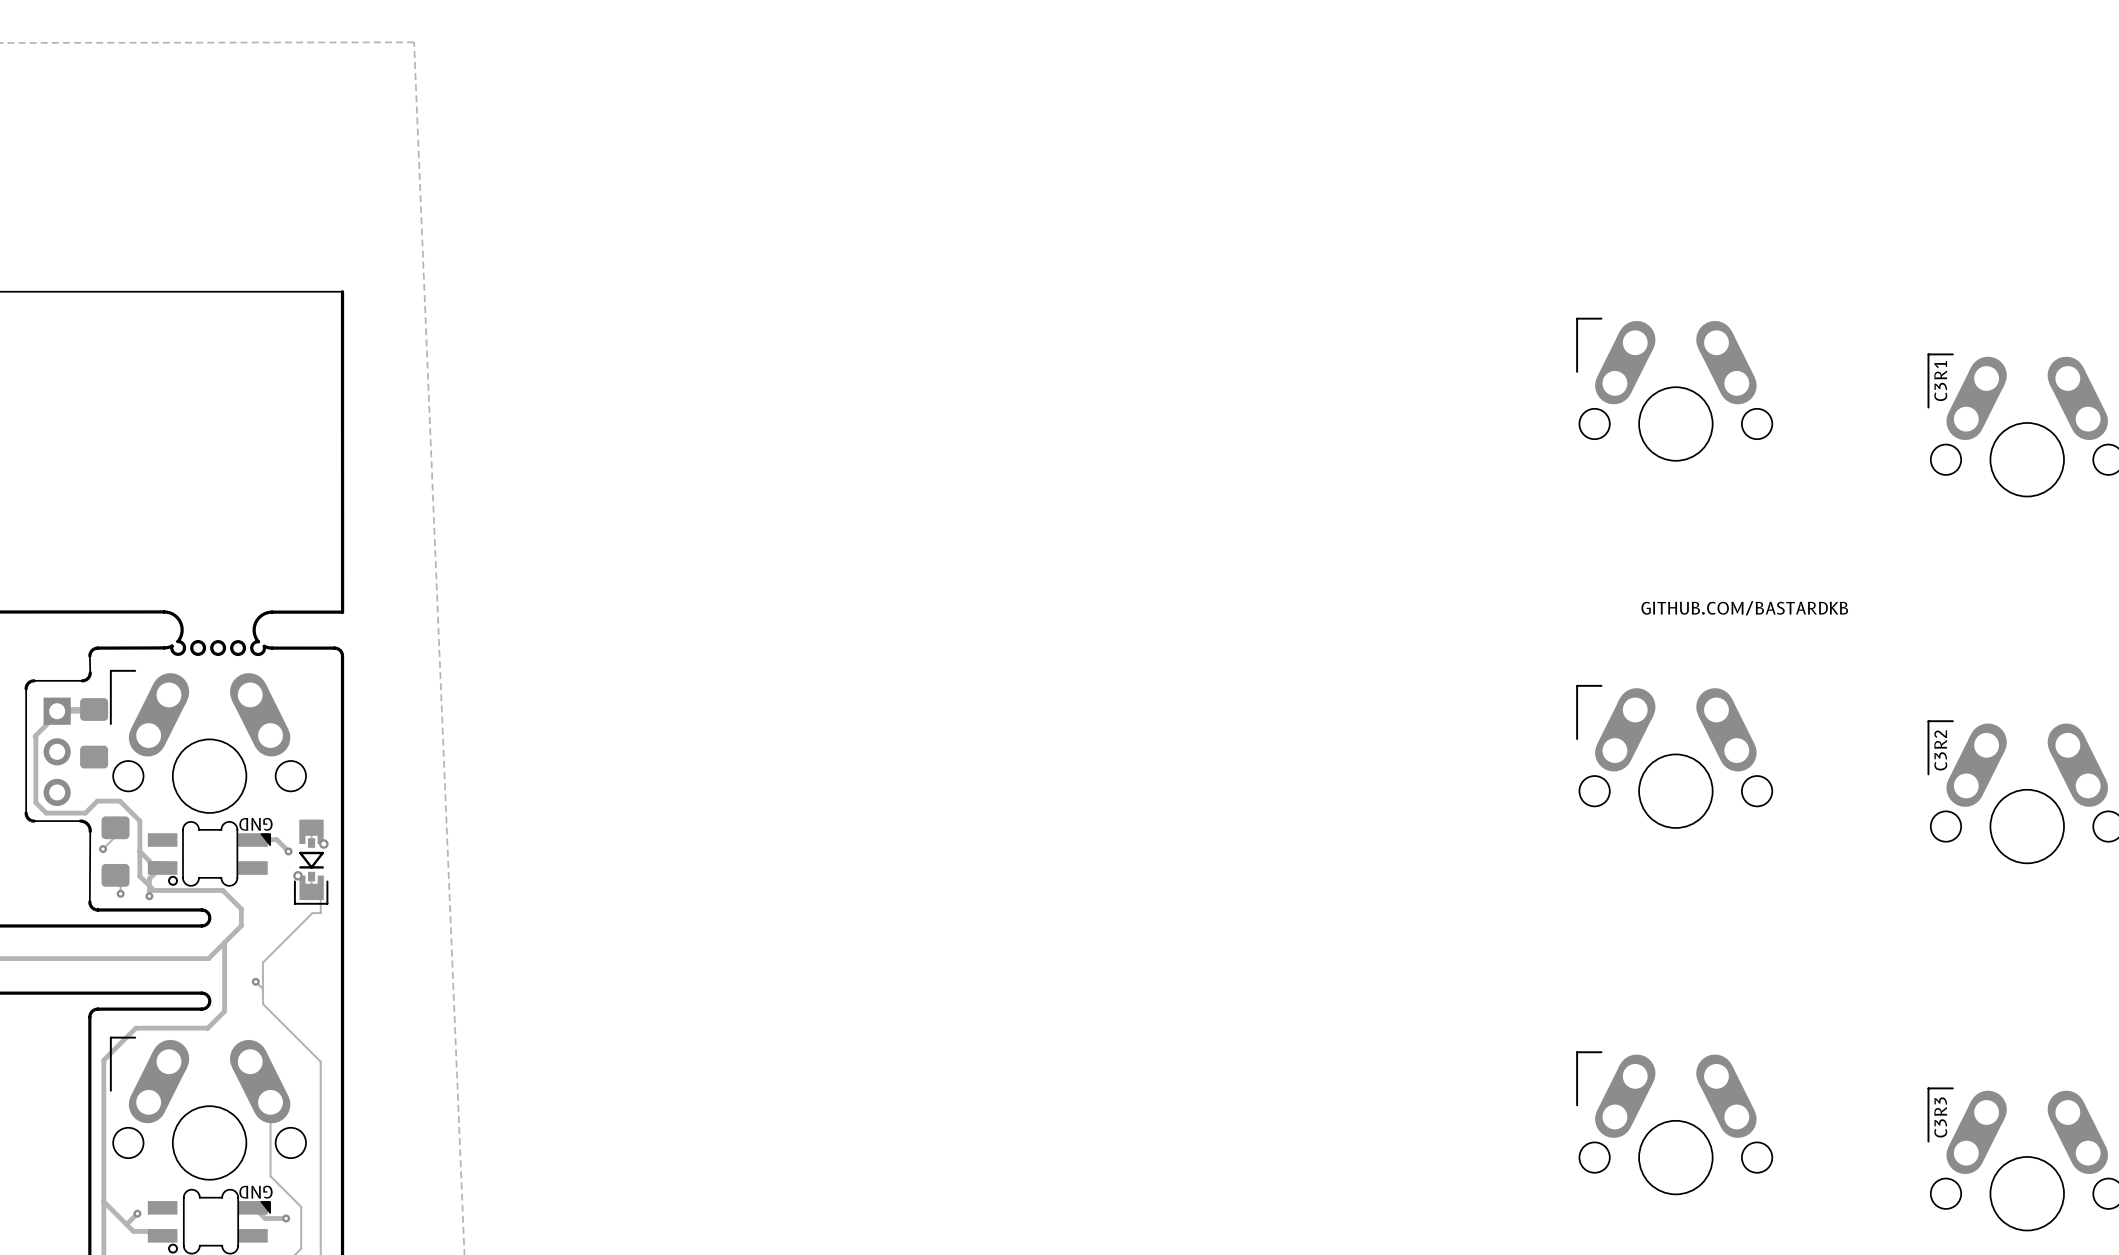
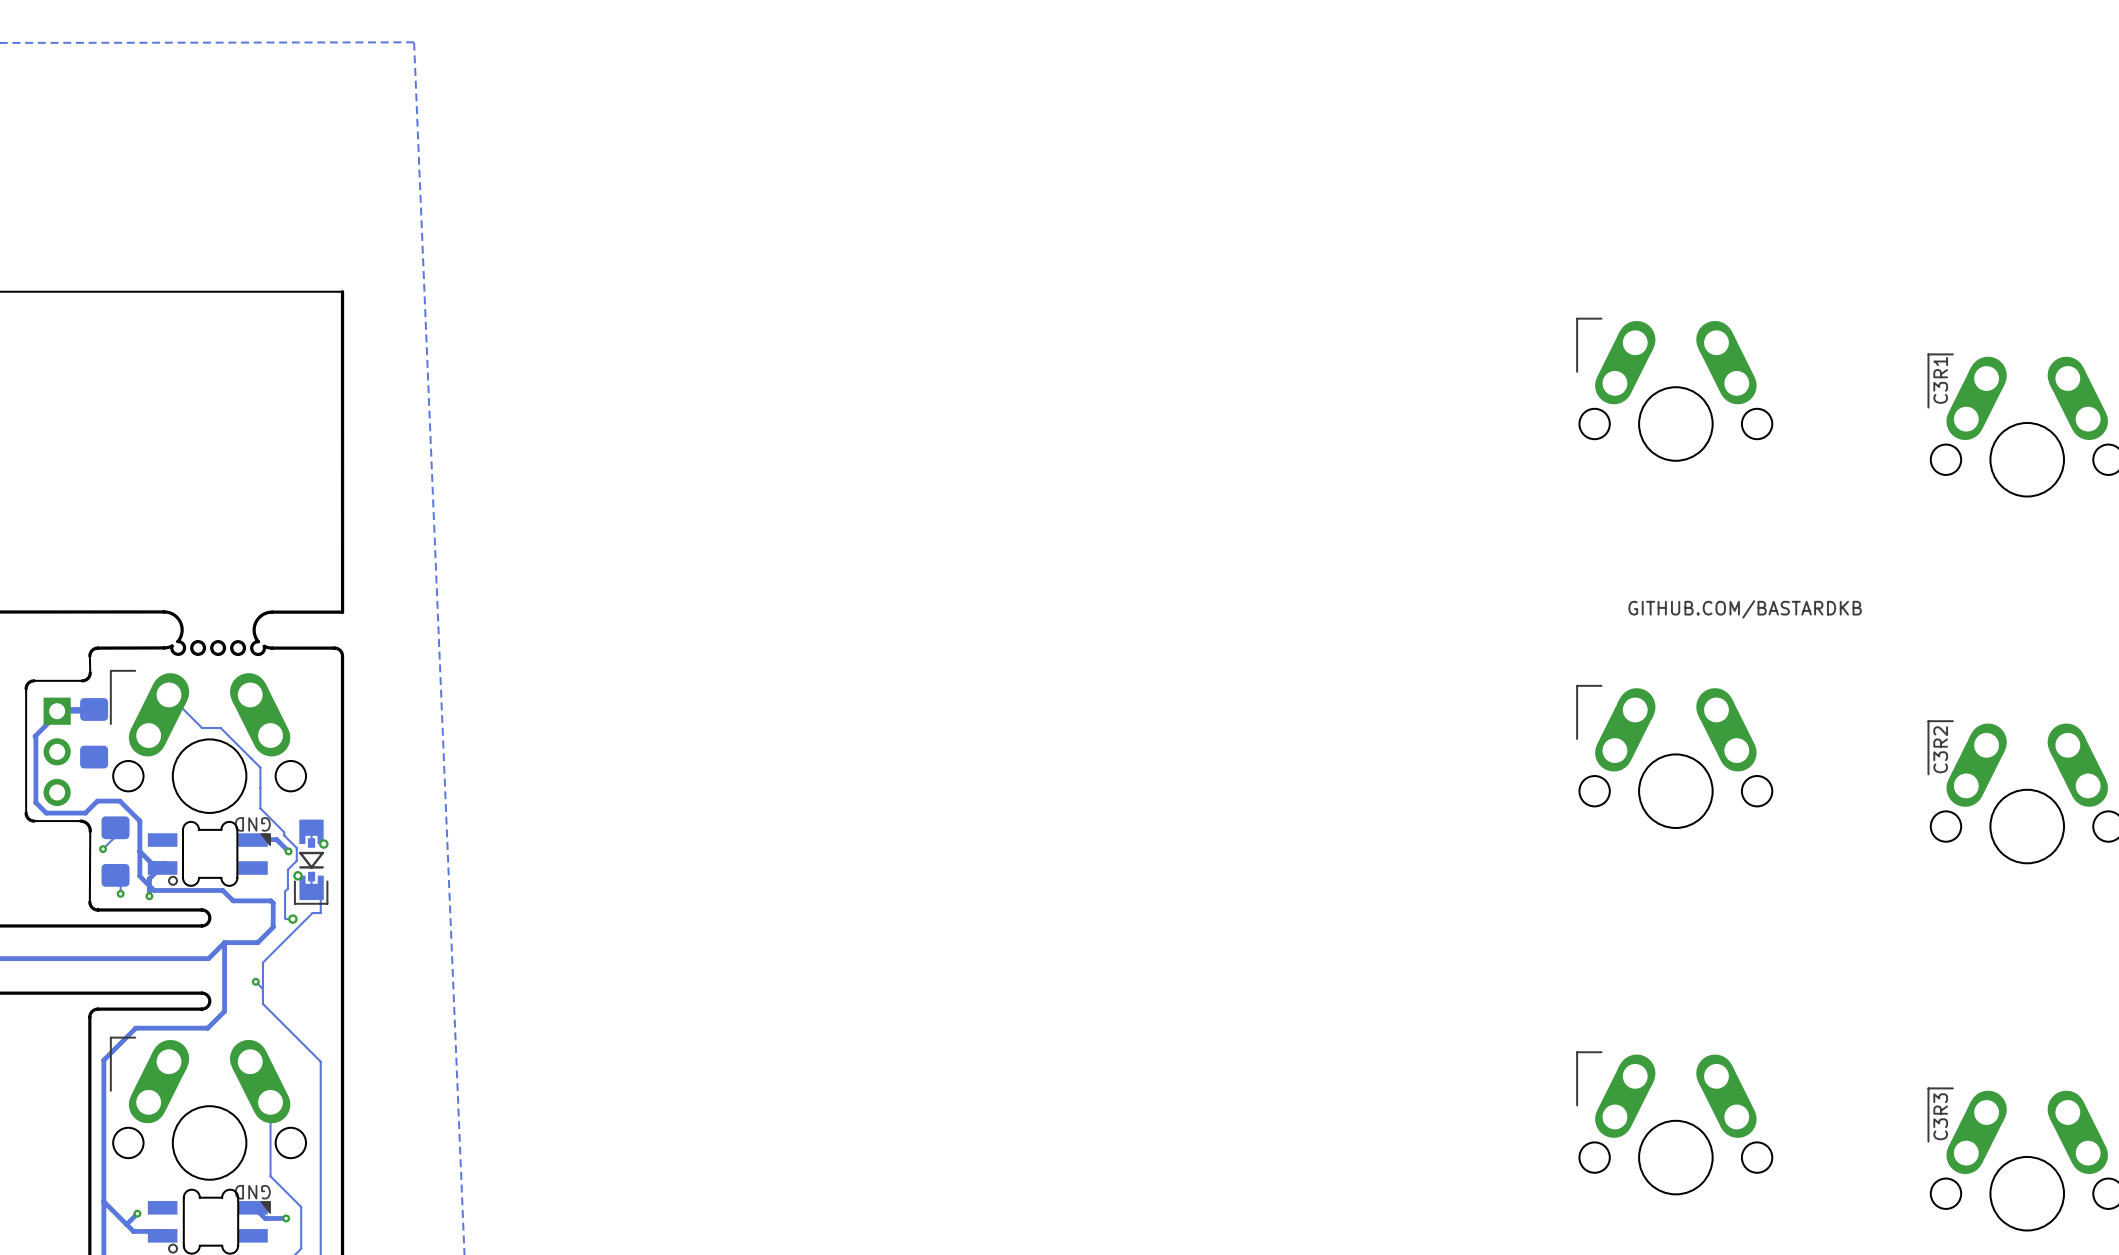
track: none -> (168, 694) (202, 728) (220, 728) (260, 767) (260, 808) (296, 848) (296, 860) (287, 869) (287, 888) (285, 891) (285, 918) (292, 919)
track: (233, 900) (241, 909) (241, 925) (224, 942) -> (233, 900) (270, 900) (273, 903) (273, 927) (257, 942) (224, 942)
via: none -> (292, 919)

